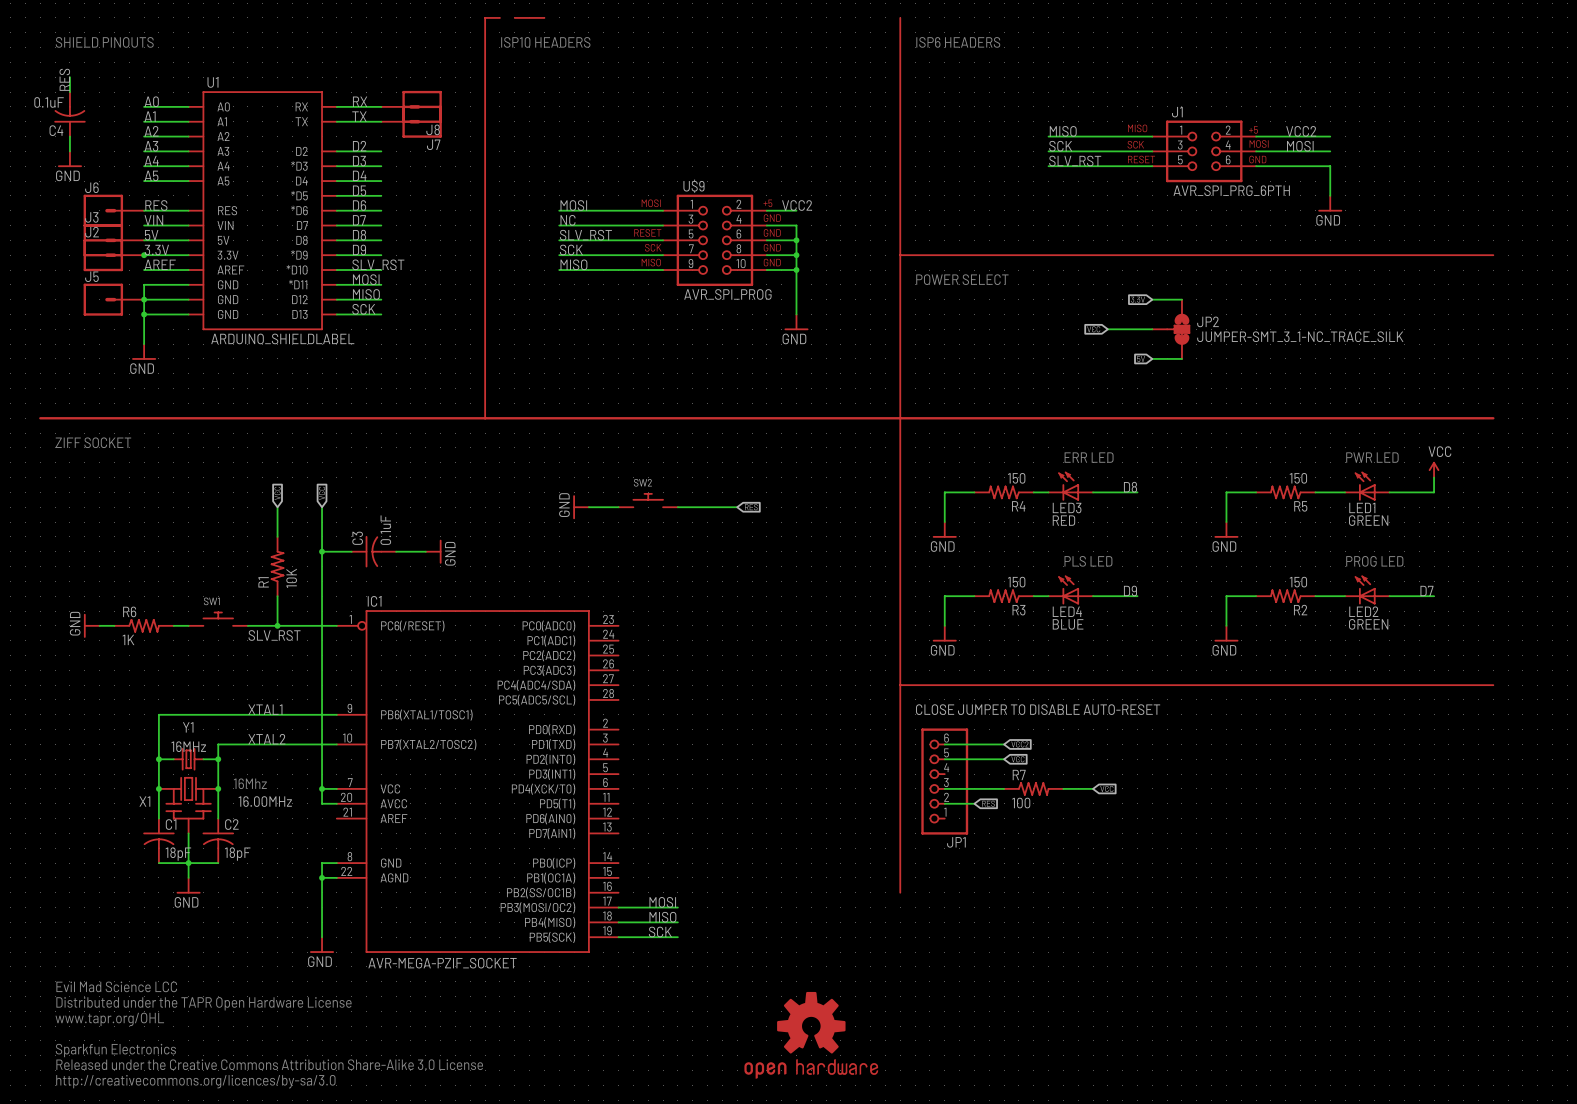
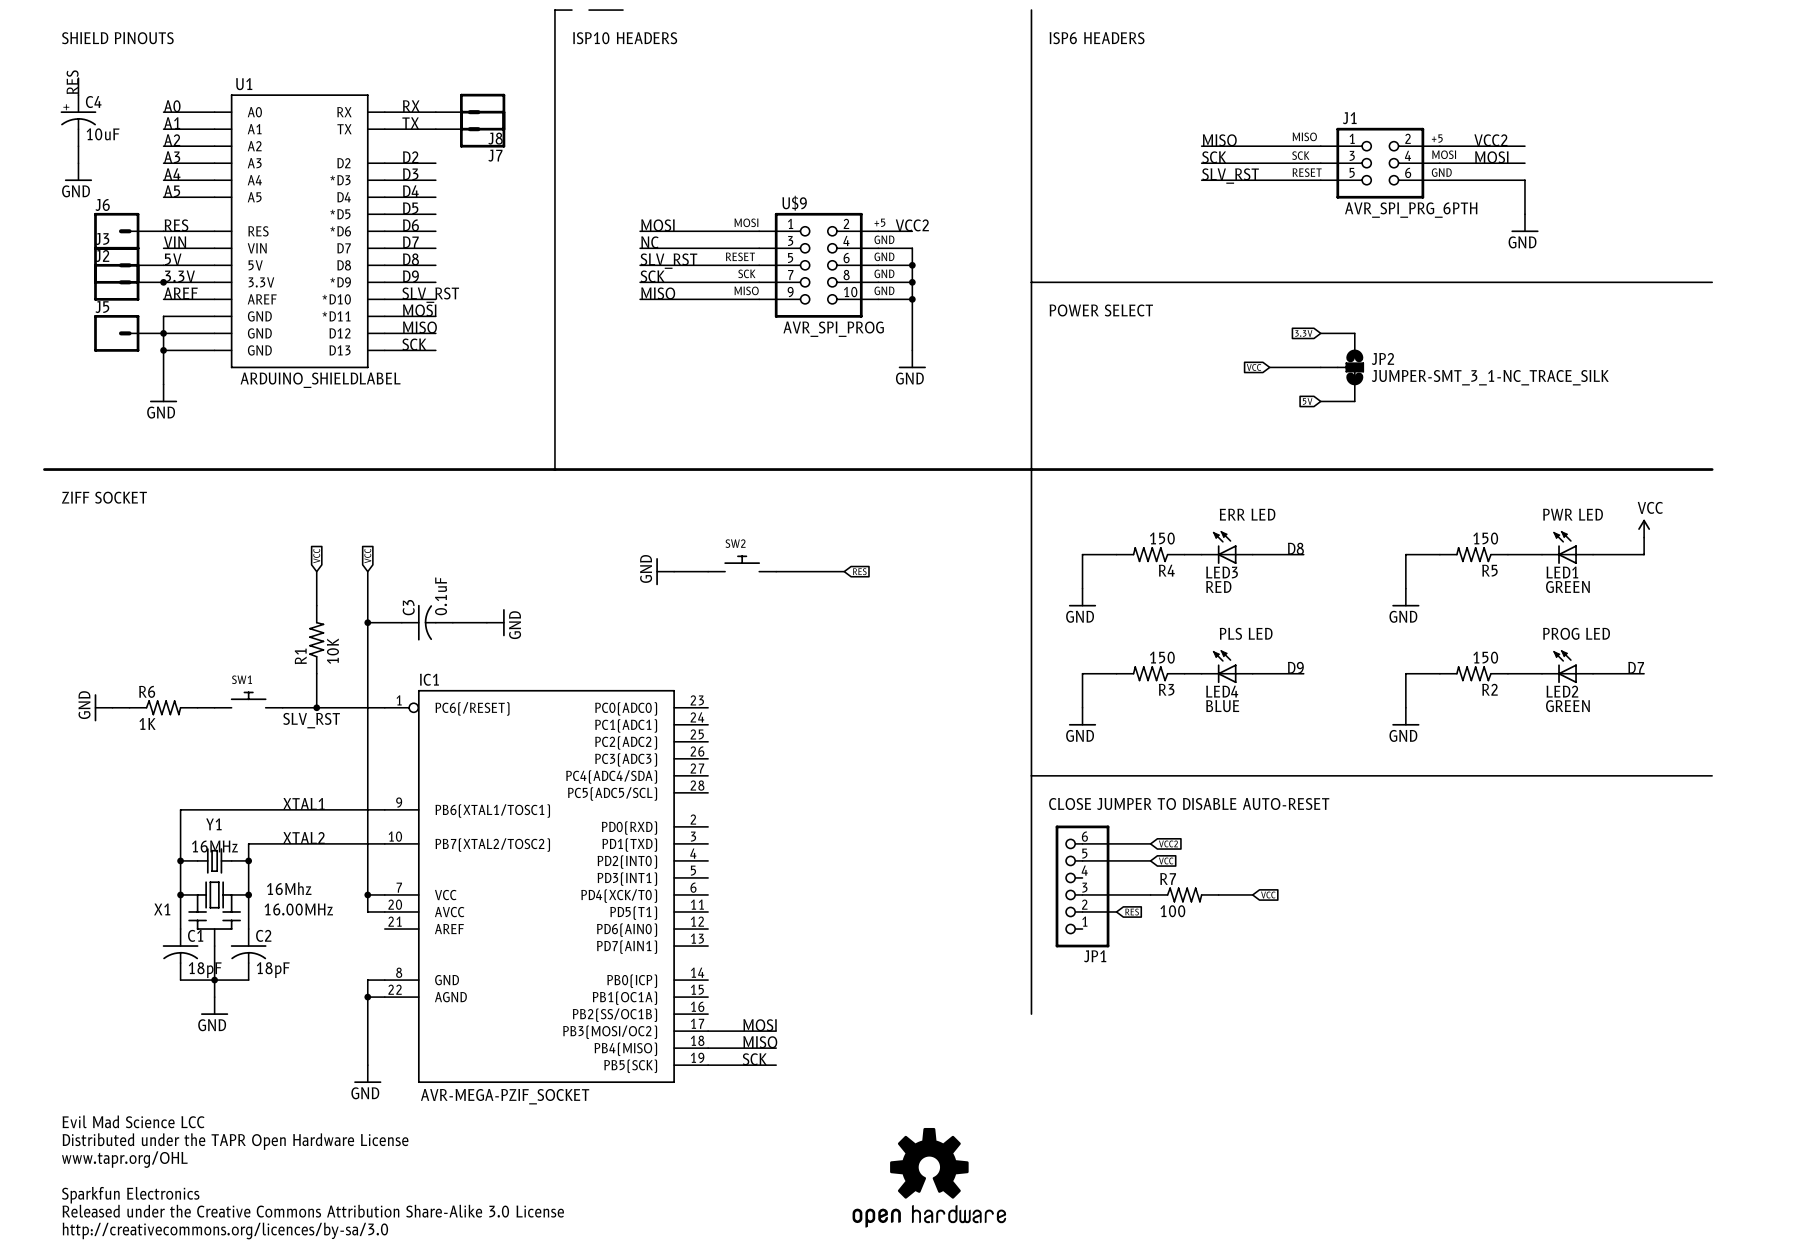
C4 symbol: [54, 92, 86, 137] -> [60, 95, 97, 147]
C4 value: 0.1uF (49, 102) -> 10uF (103, 134)
C4 name position: C4 (56, 130) -> C4 (93, 102)

